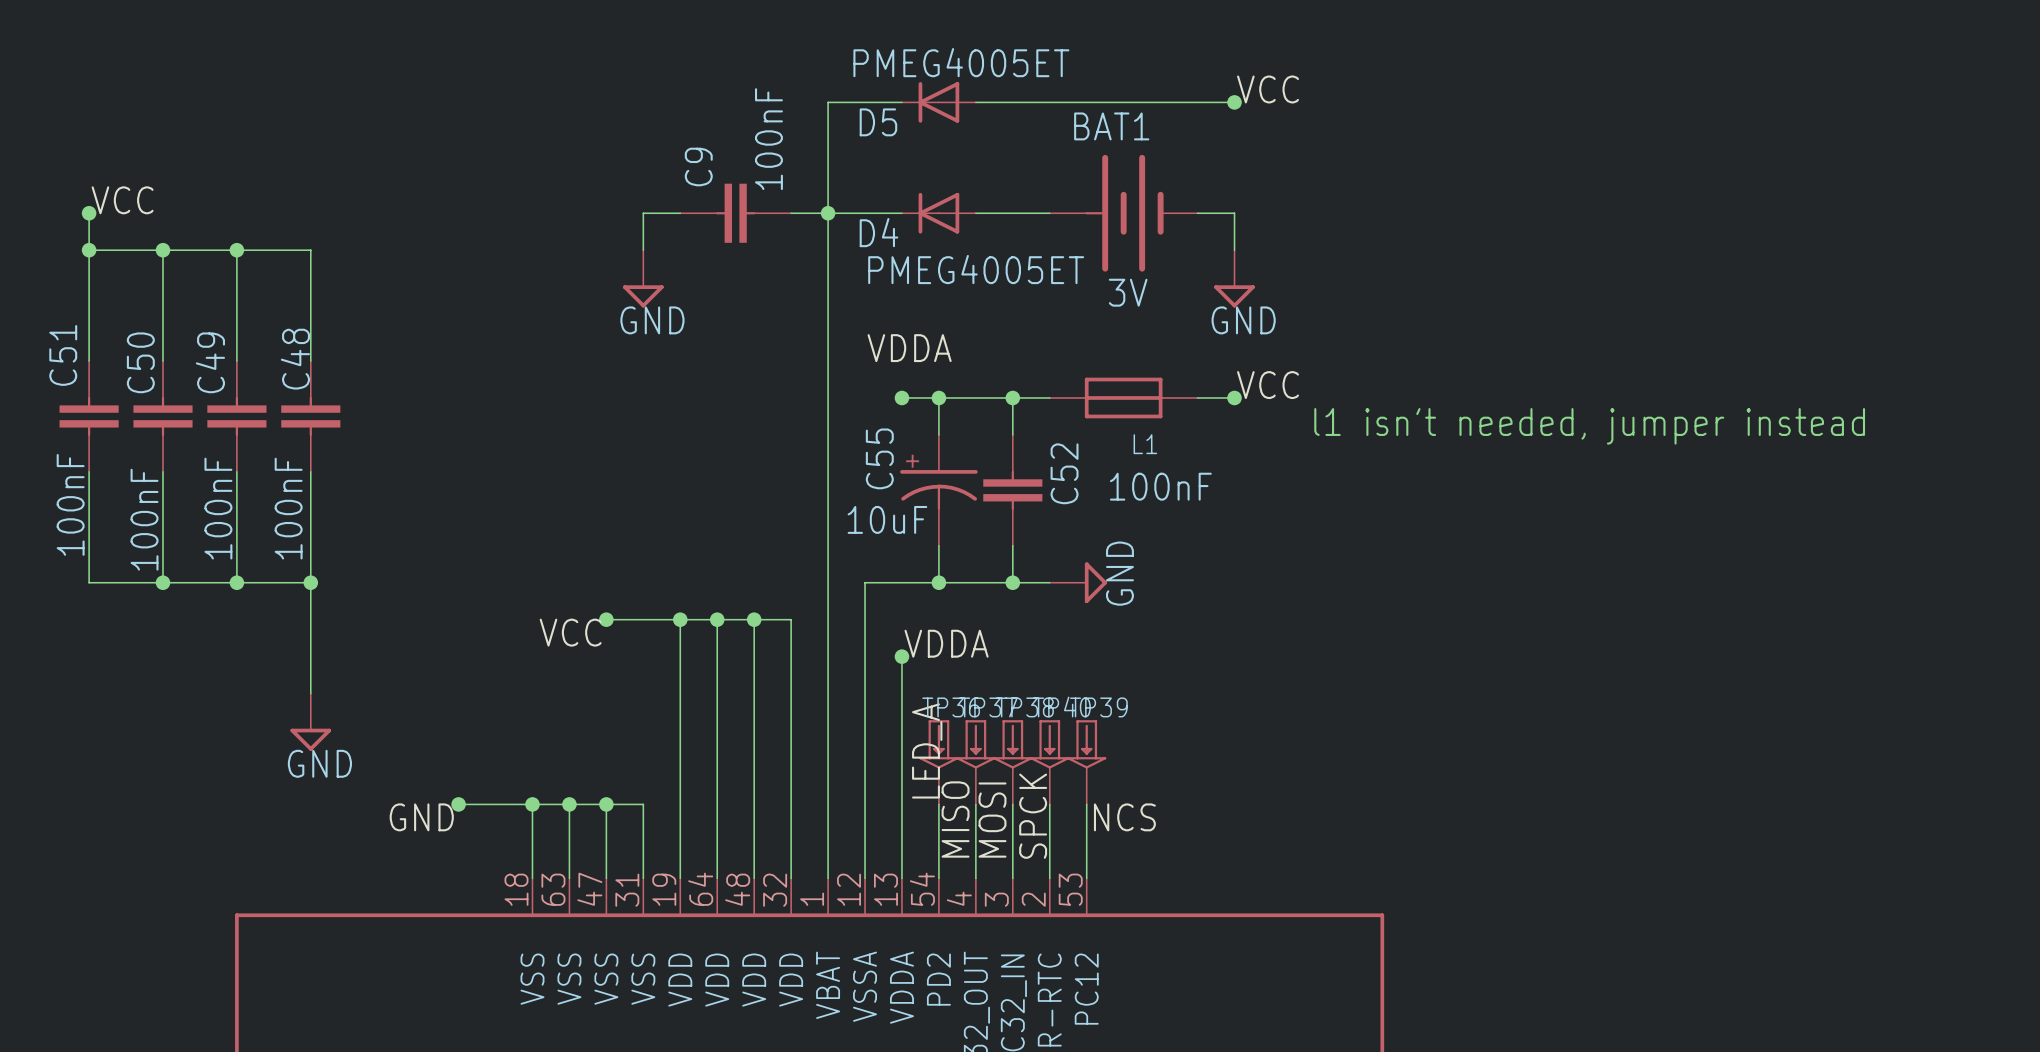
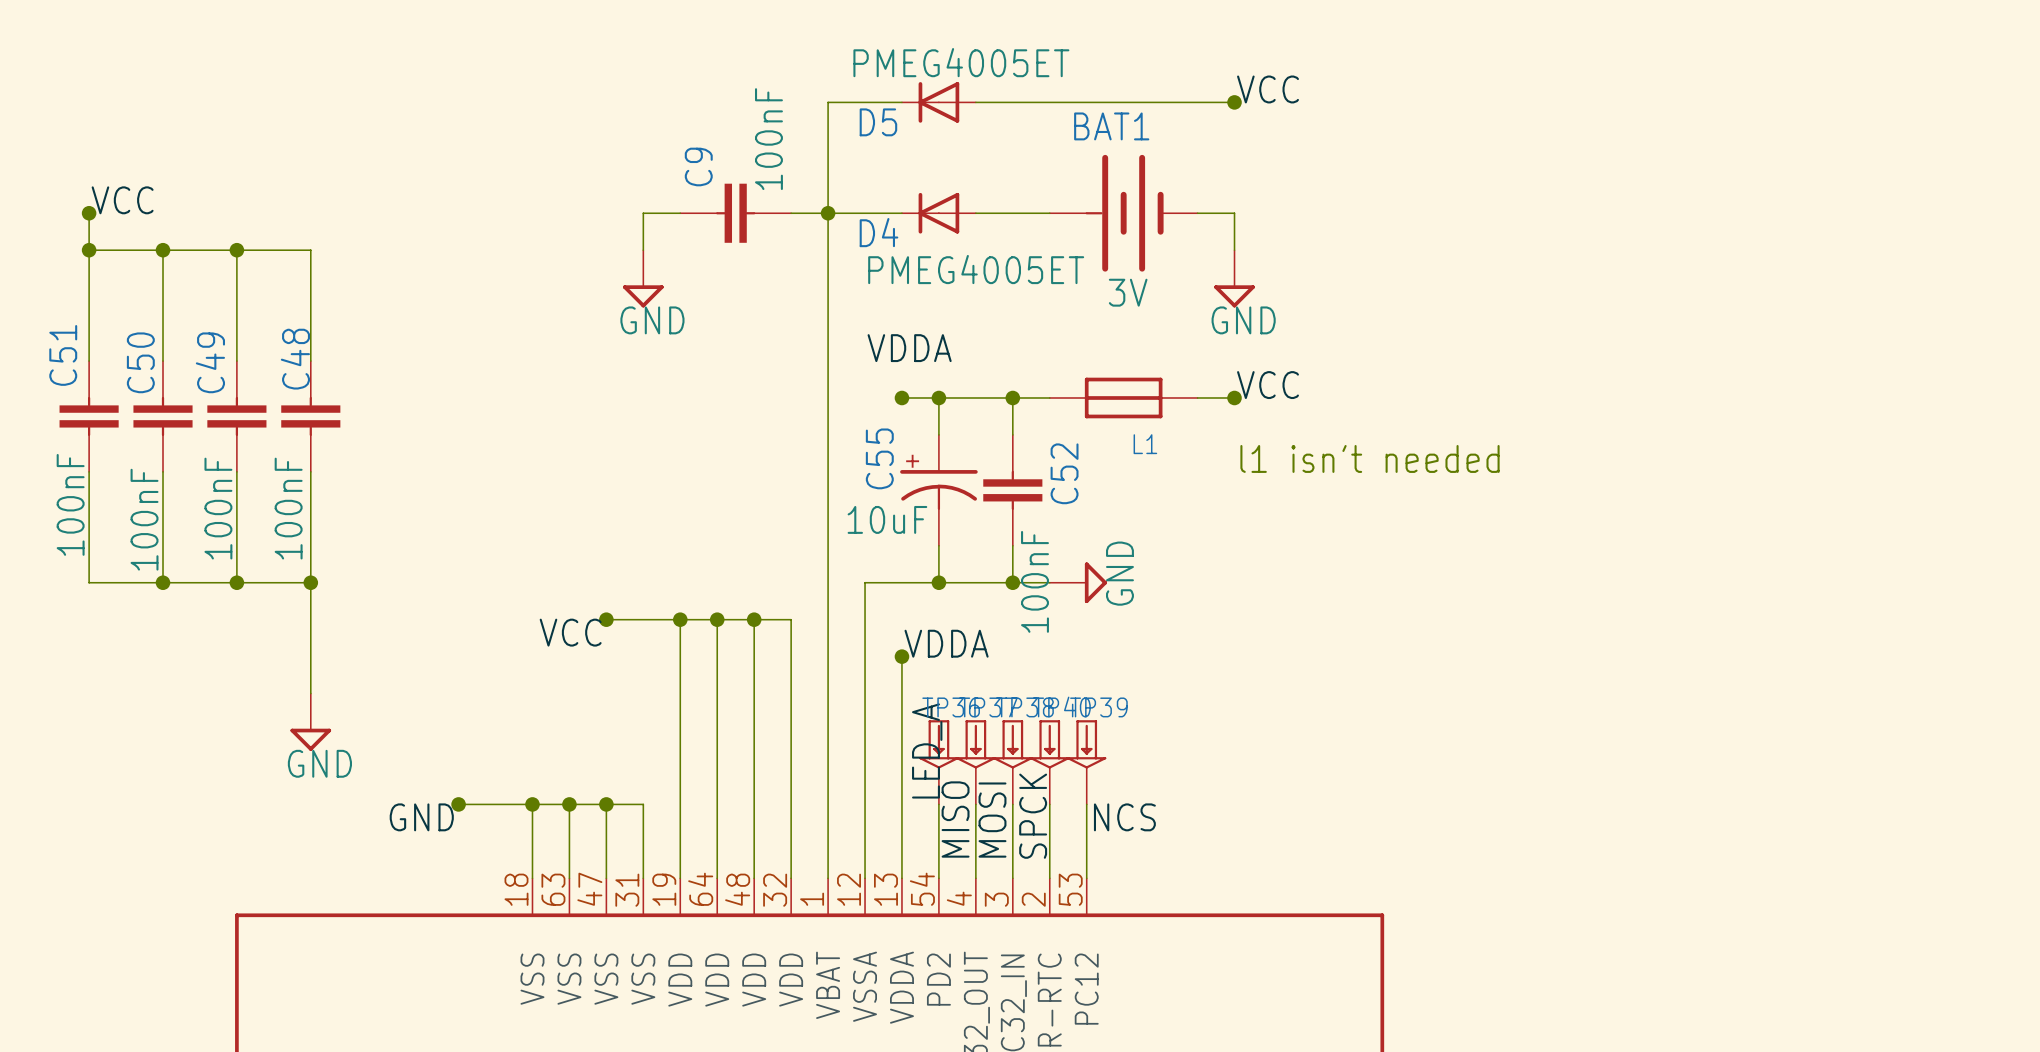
text: l1 isn't needed, jumper instead (1589, 426) -> l1 isn't needed (1369, 458)
C52 value rotation: 0° (1160, 486) -> 90° counterclockwise (1034, 581)
C52 value position: 100nF (1160, 486) -> 100nF (1034, 581)

